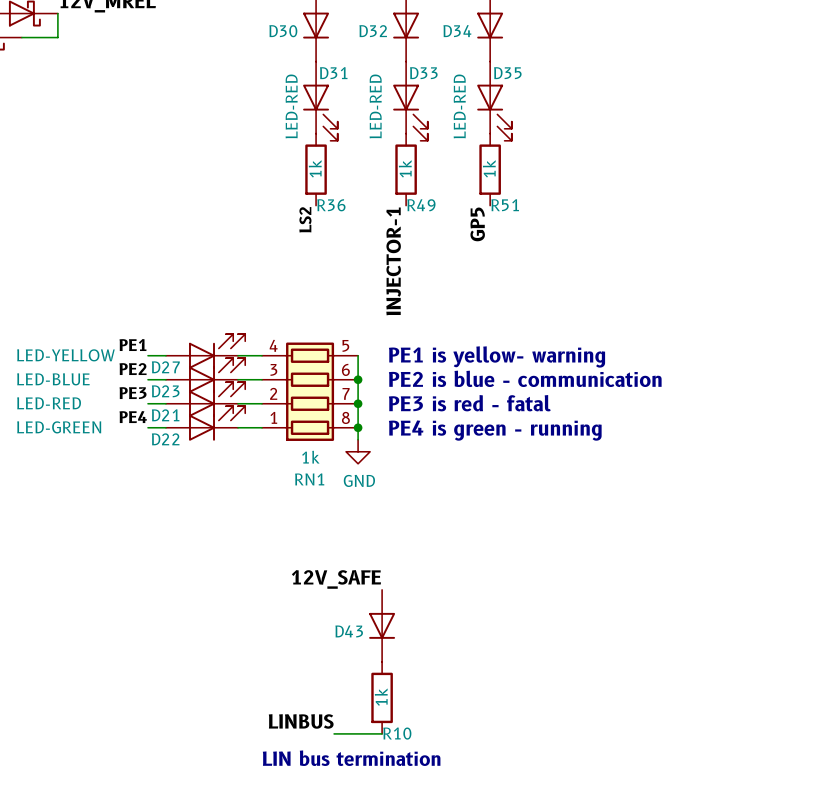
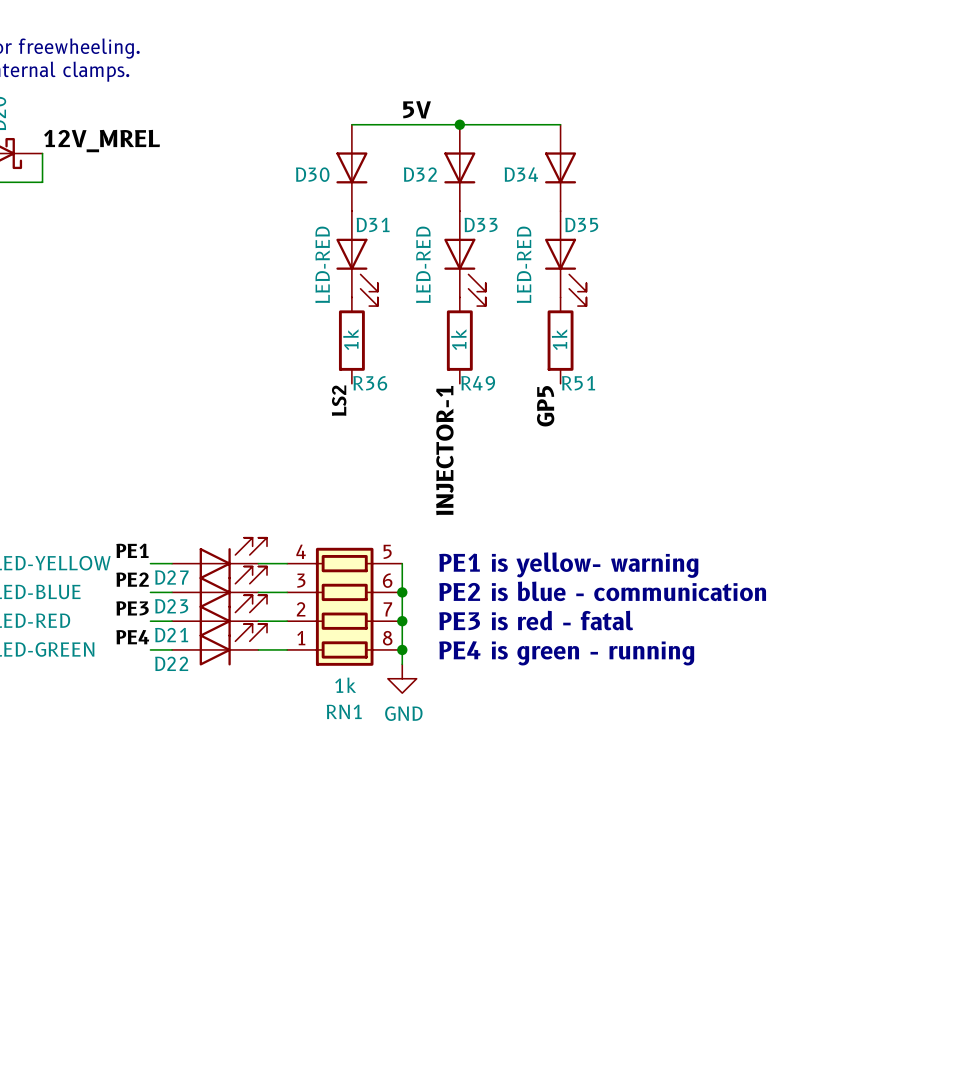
label: 12V_SAFE (336, 579) -> none
D43: (382, 625) -> none
R10: 1k (382, 697) -> none
label: LINBUS (301, 721) -> none
wire: (334, 733) (382, 733) -> none
text: LIN bus termination (351, 758) -> none

